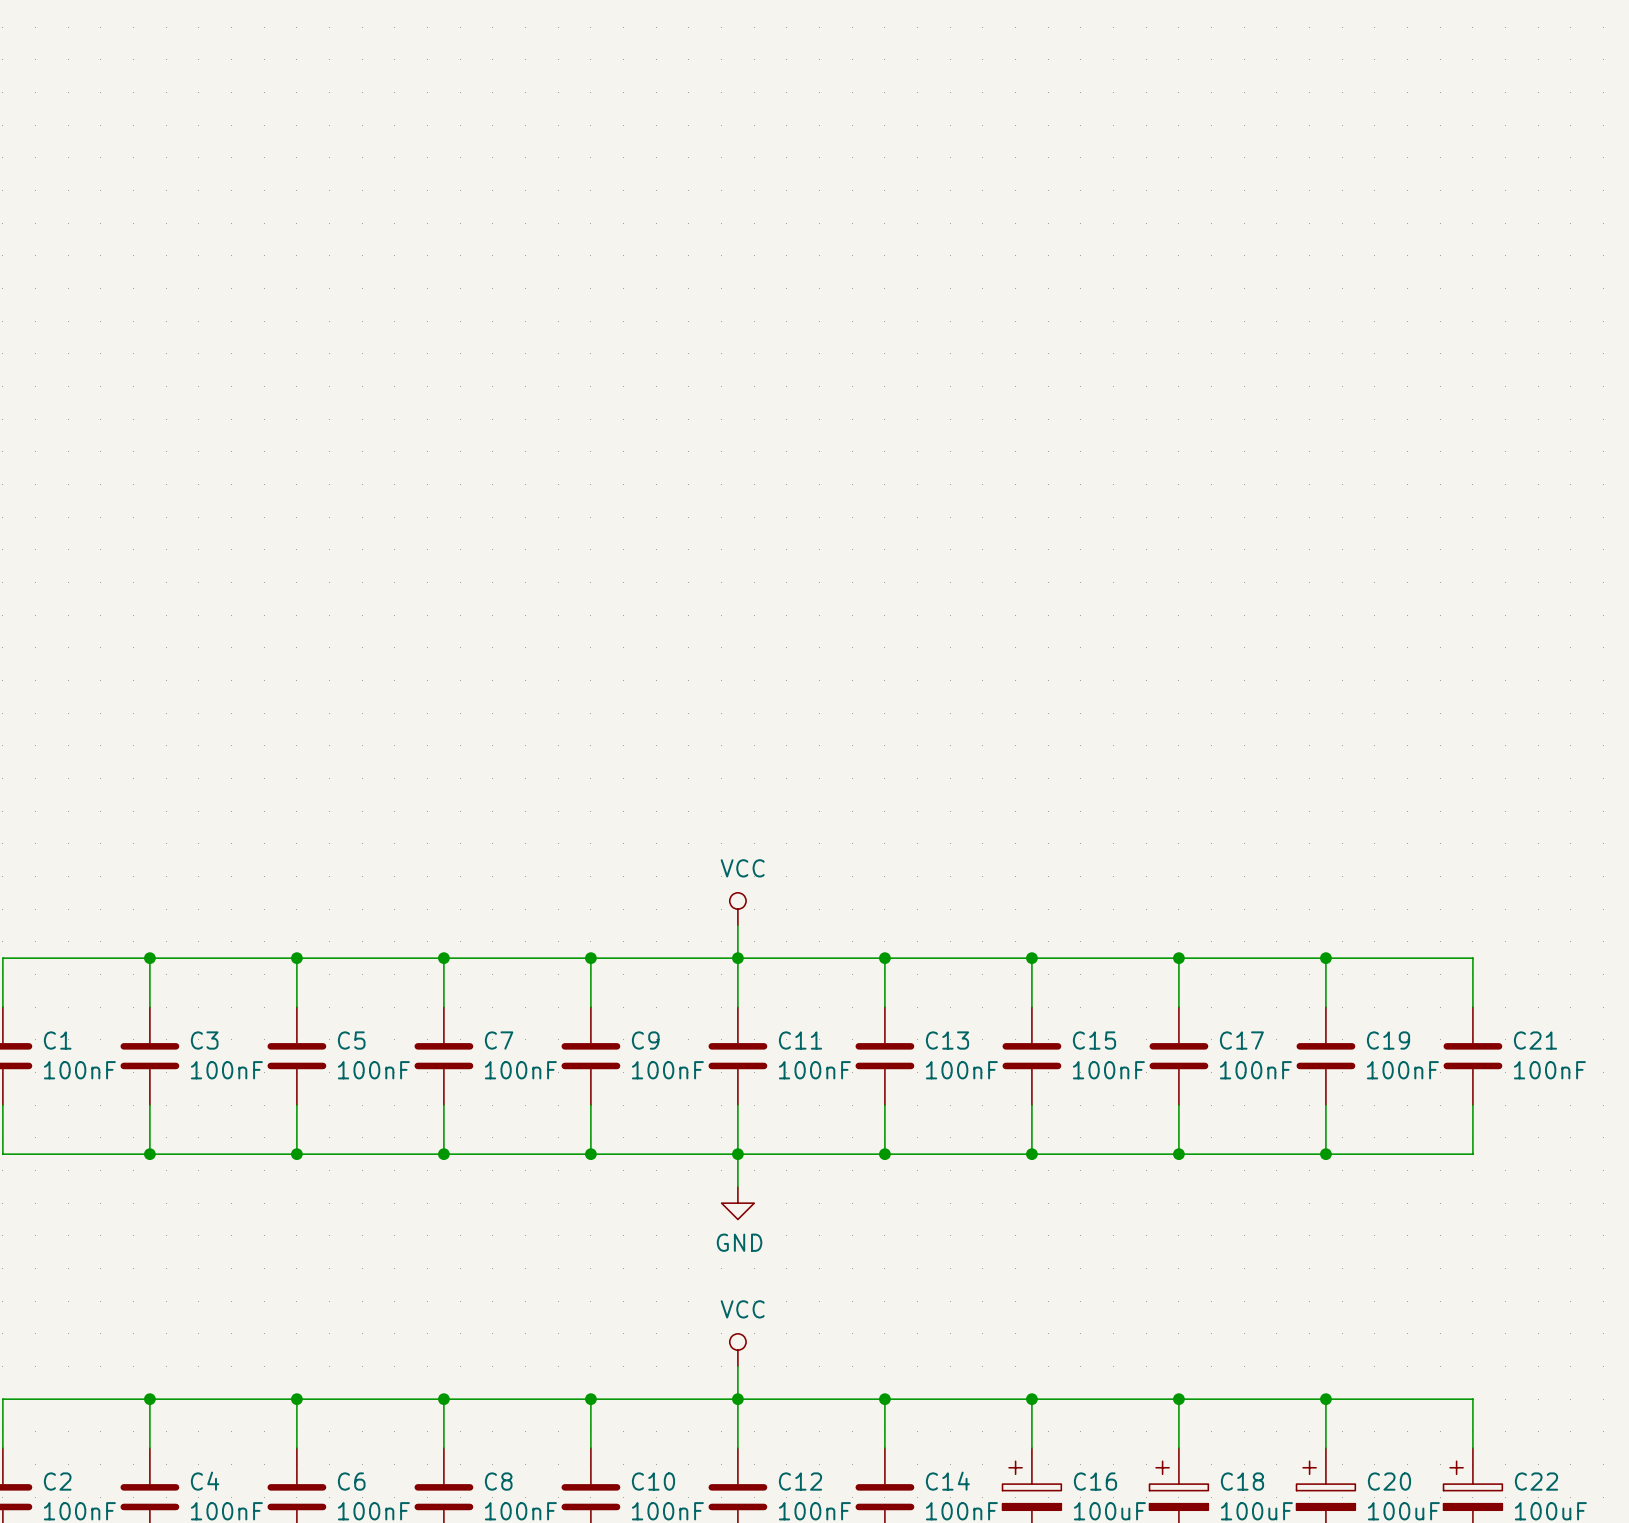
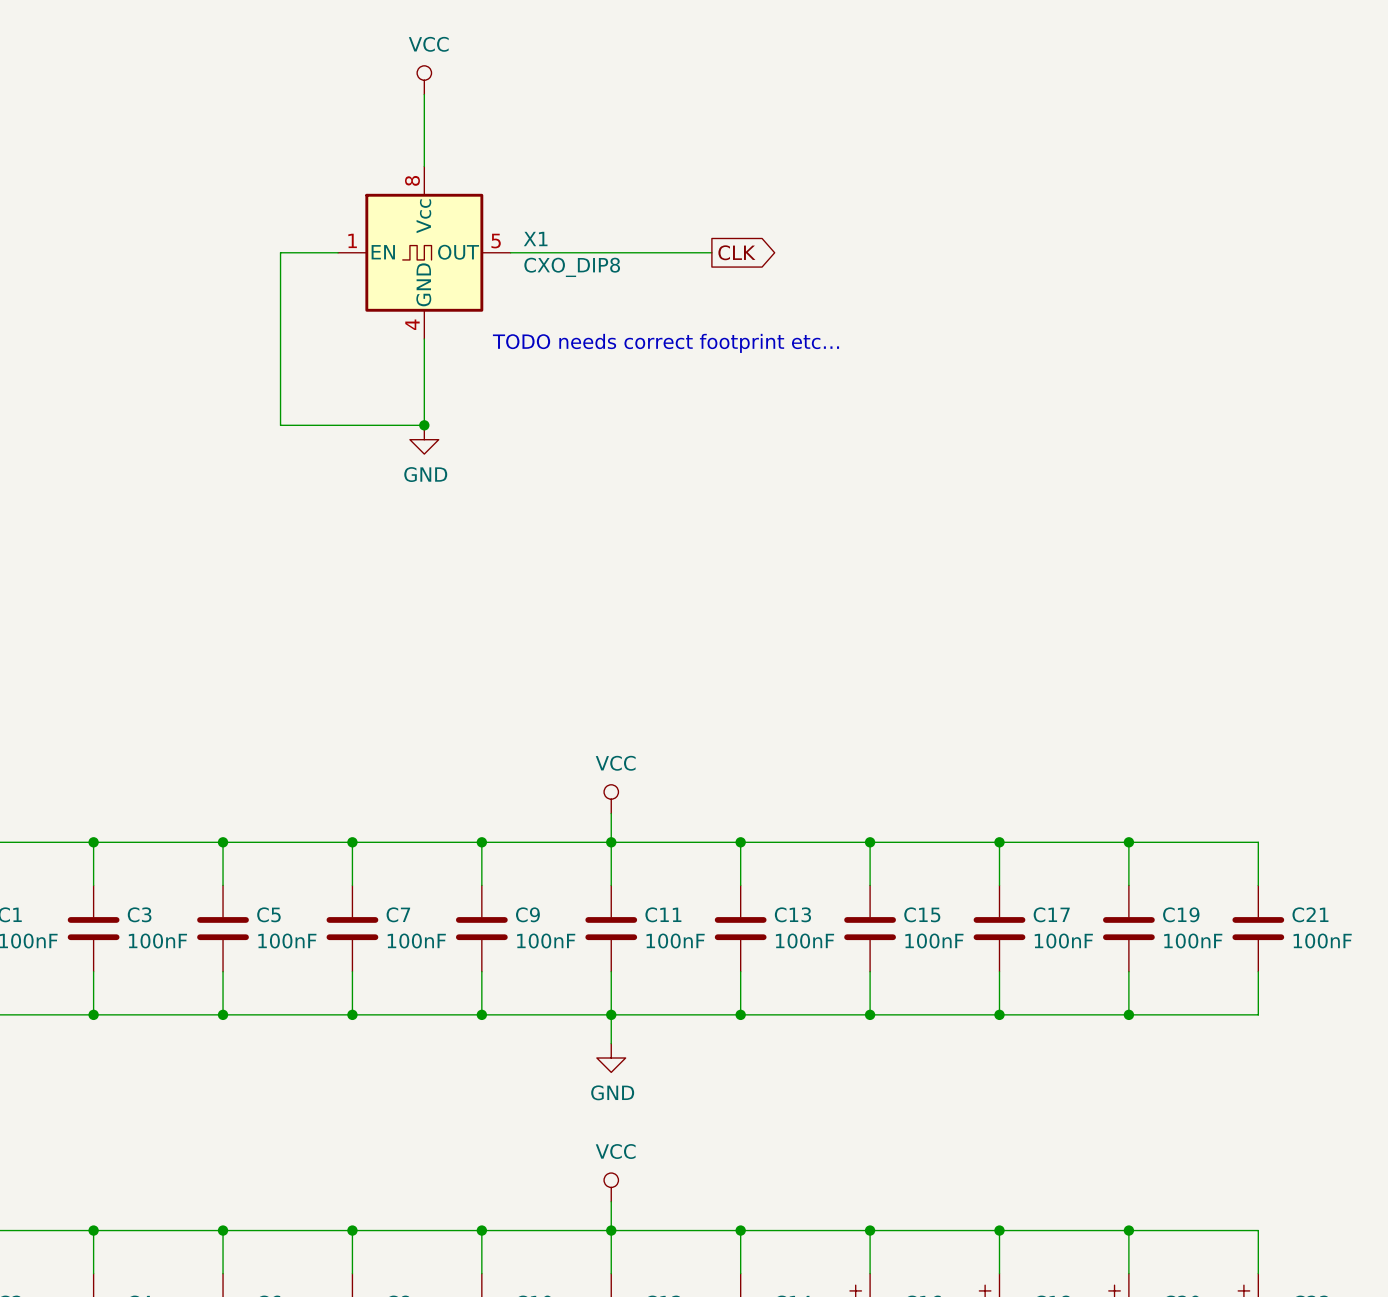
power symbol: none -> VCC (424, 80)
wire: none -> (424, 94) (424, 166)
wire: none -> (338, 252) (280, 252) (280, 425) (424, 425) (424, 339)
X1: none -> CXO_DIP8 (424, 252)
wire: none -> (510, 252) (711, 252)
global label: none -> CLK (736, 252)
text: none -> TODO needs correct footprint etc… (665, 343)
junction: none -> (424, 425)
power symbol: none -> GND (424, 439)

